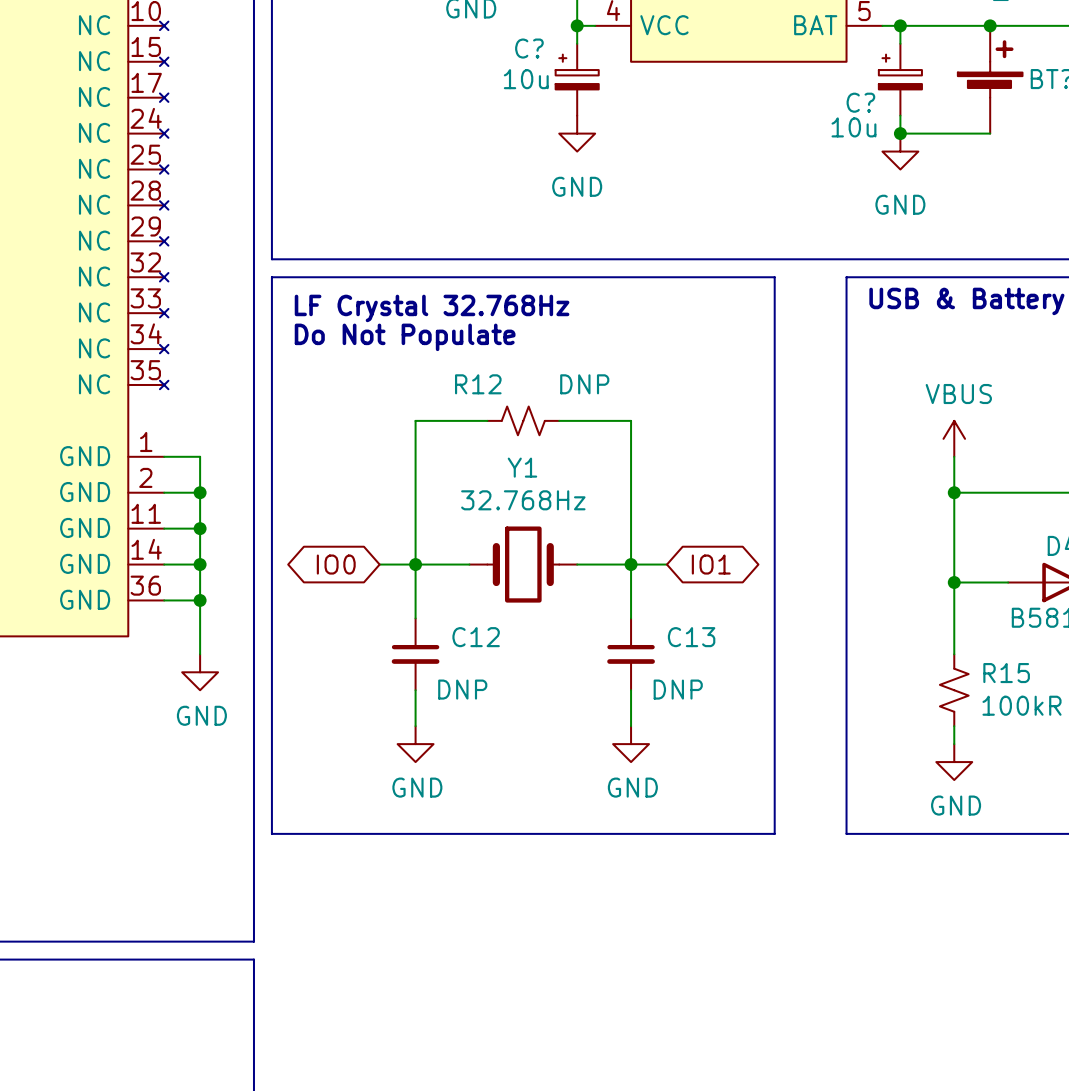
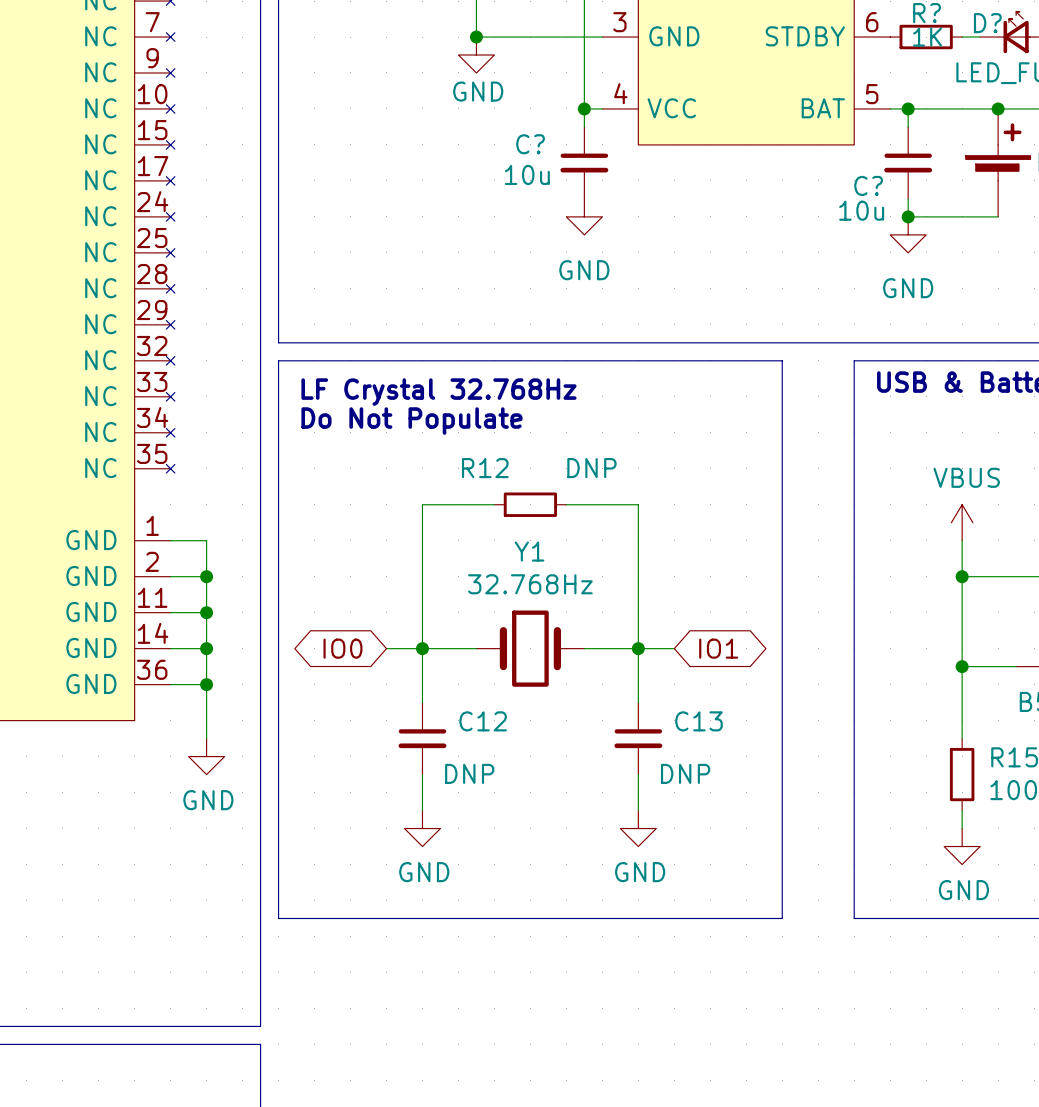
C? symbol: [555, 43, 599, 116] -> [560, 126, 609, 199]
C? symbol: [878, 43, 922, 116] -> [884, 126, 933, 199]
R12 symbol: [487, 406, 560, 436] -> [494, 492, 567, 517]
R15 symbol: [939, 654, 969, 727] -> [949, 738, 975, 811]

